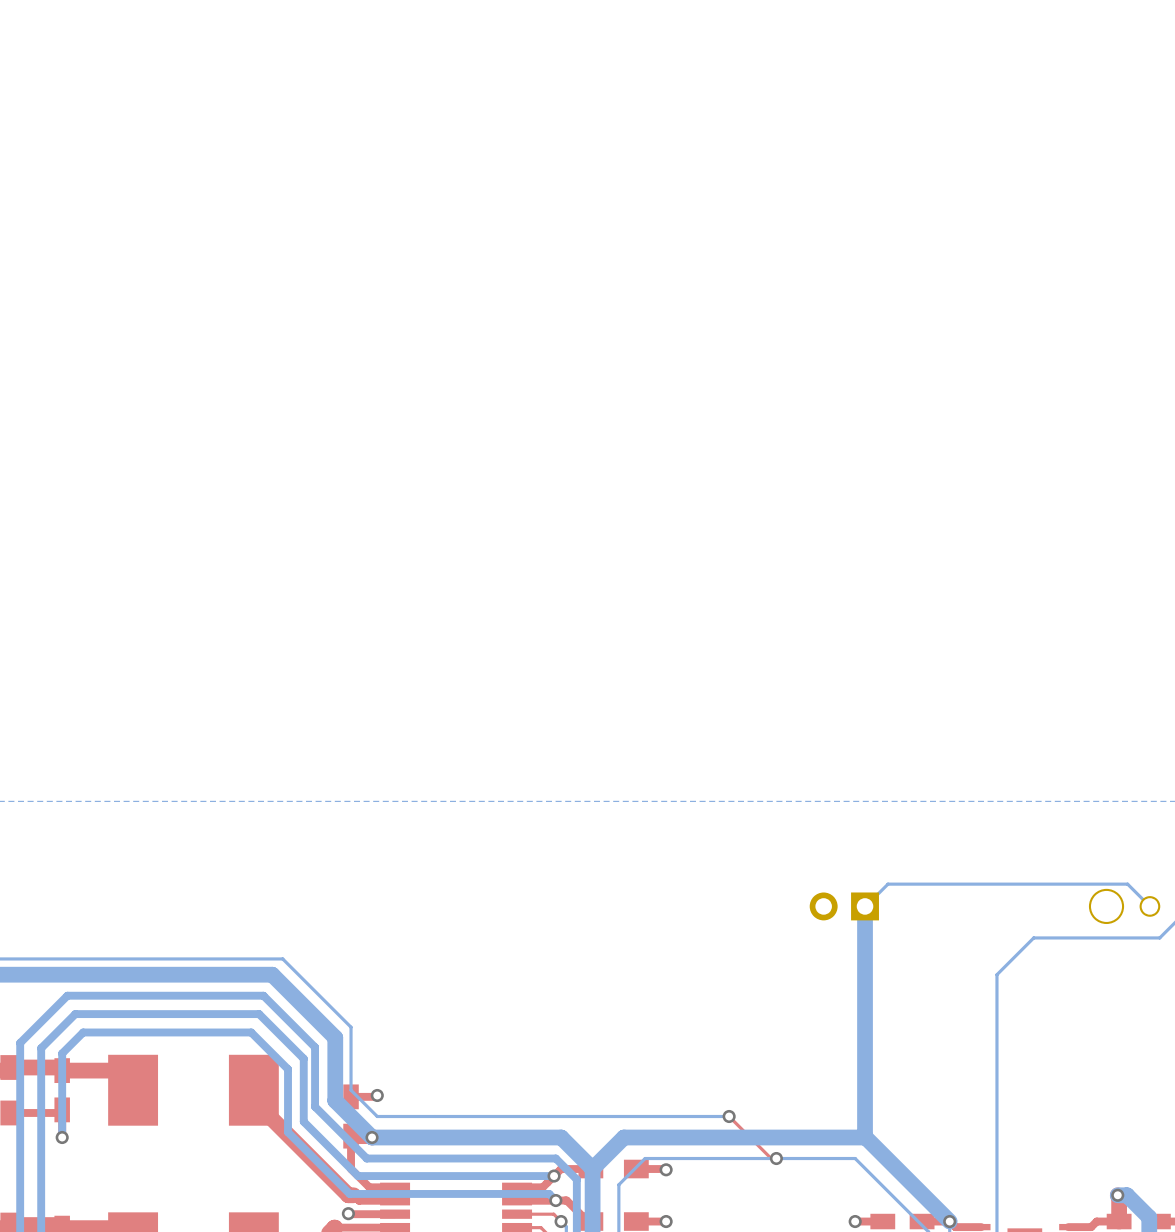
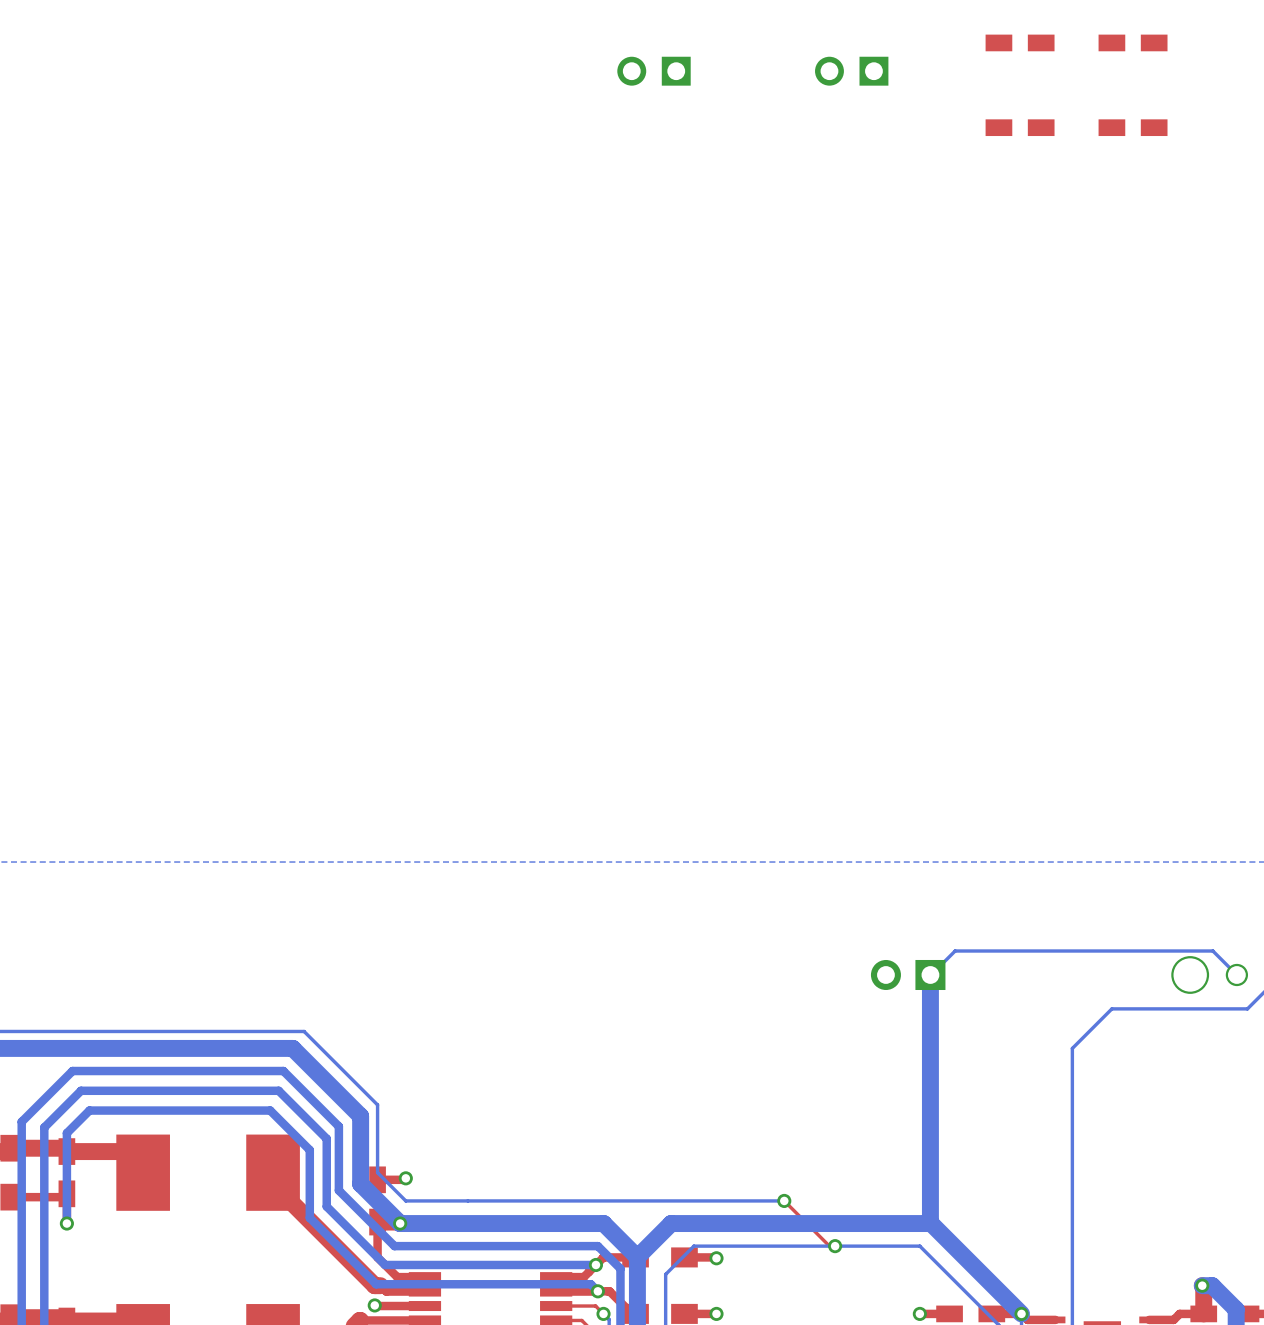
part: none -> (1020, 42)
part: none -> (1133, 42)
part: none -> (654, 71)
part: none -> (851, 71)
part: none -> (1020, 127)
part: none -> (1133, 127)

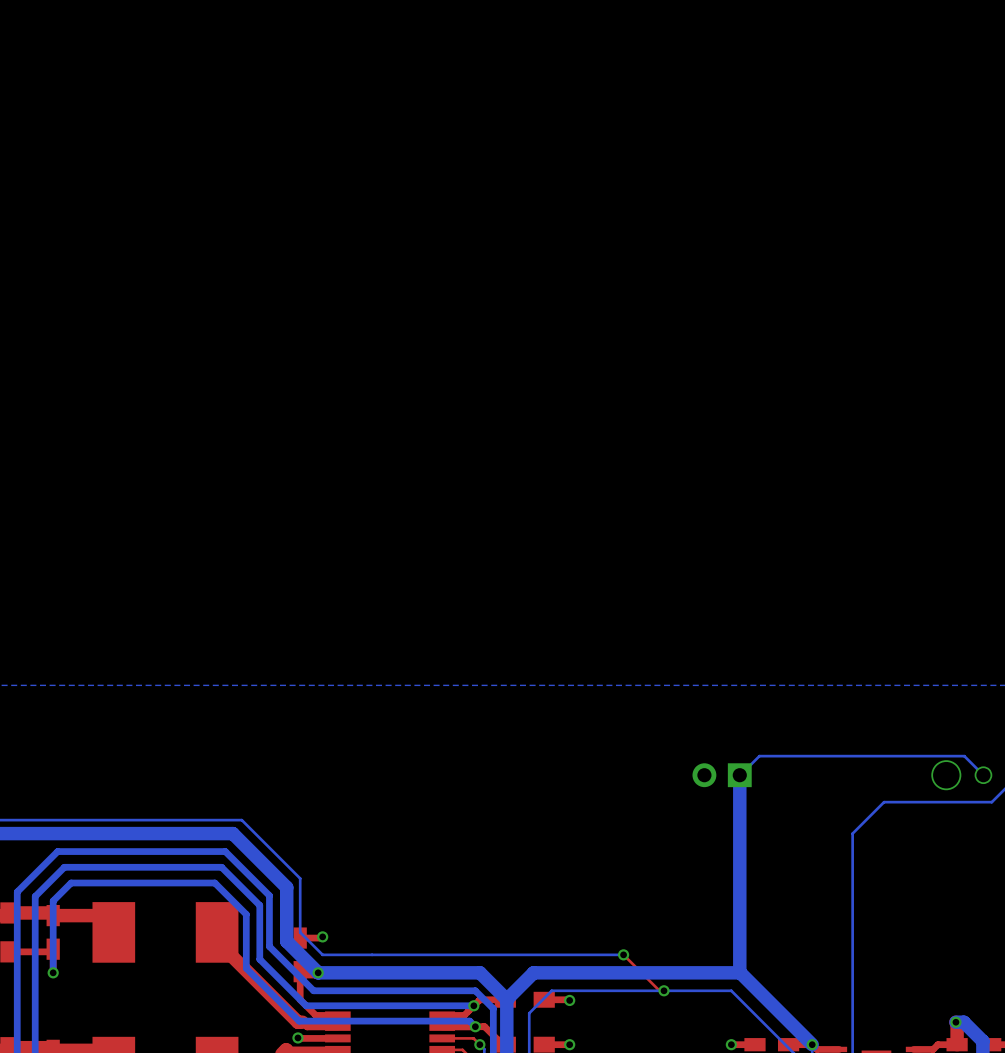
part: (1020, 42) -> none
part: (1133, 42) -> none
part: (654, 71) -> none
part: (851, 71) -> none
part: (1020, 127) -> none
part: (1133, 127) -> none

